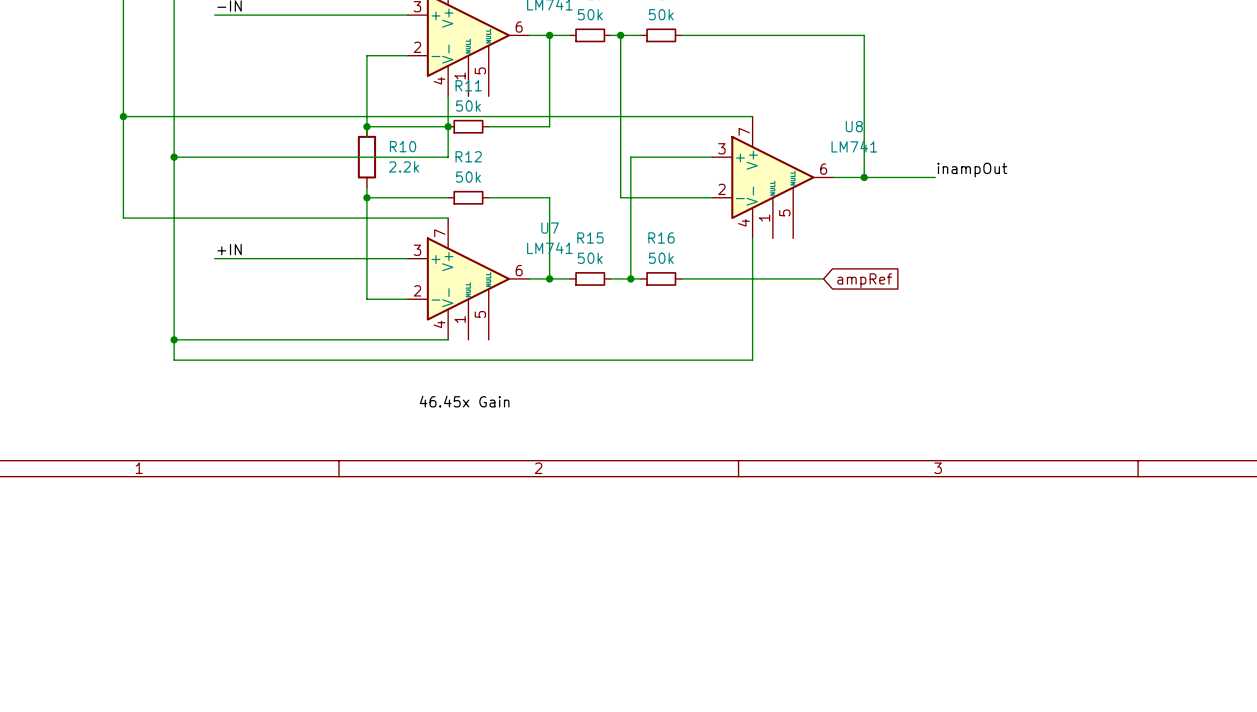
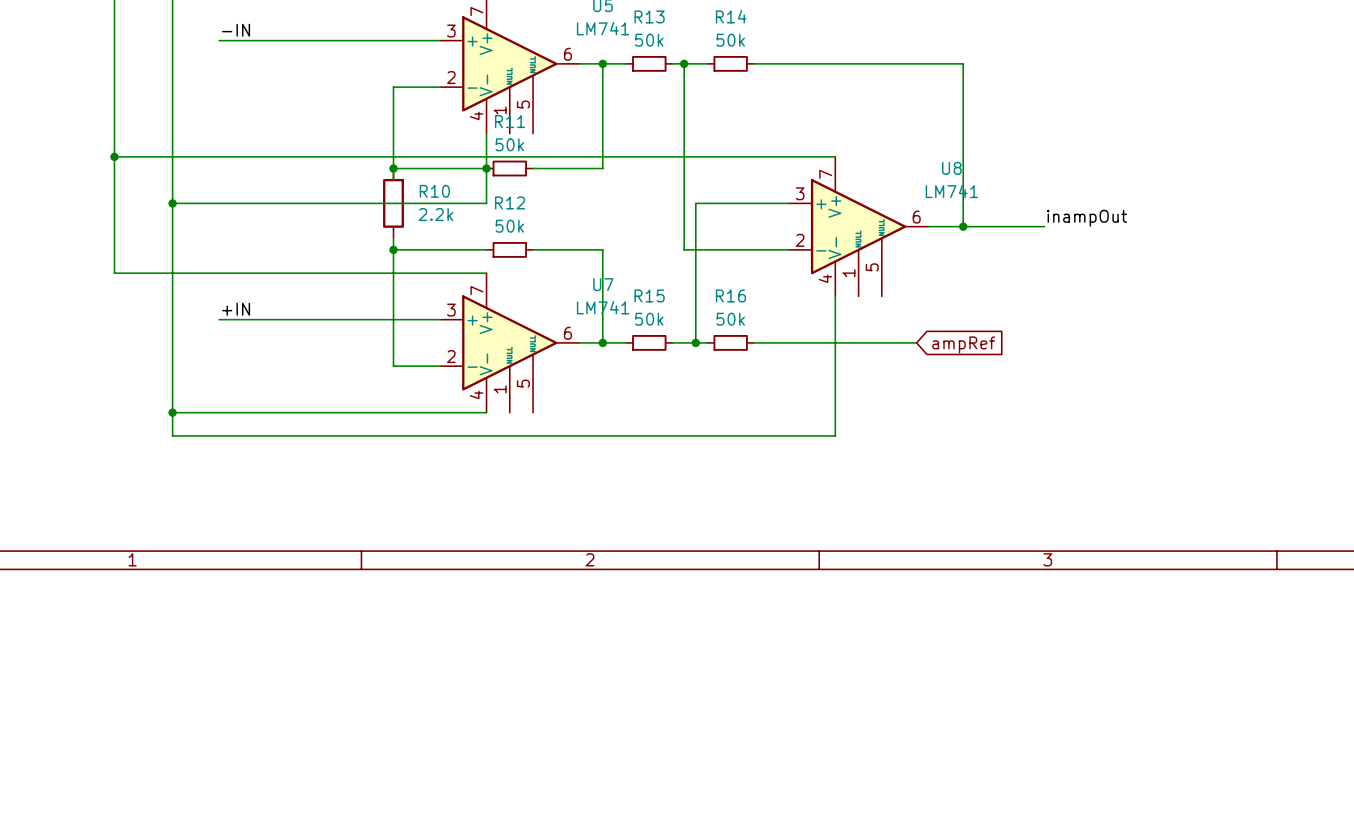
label: 46.45x Gain (464, 401) -> none

